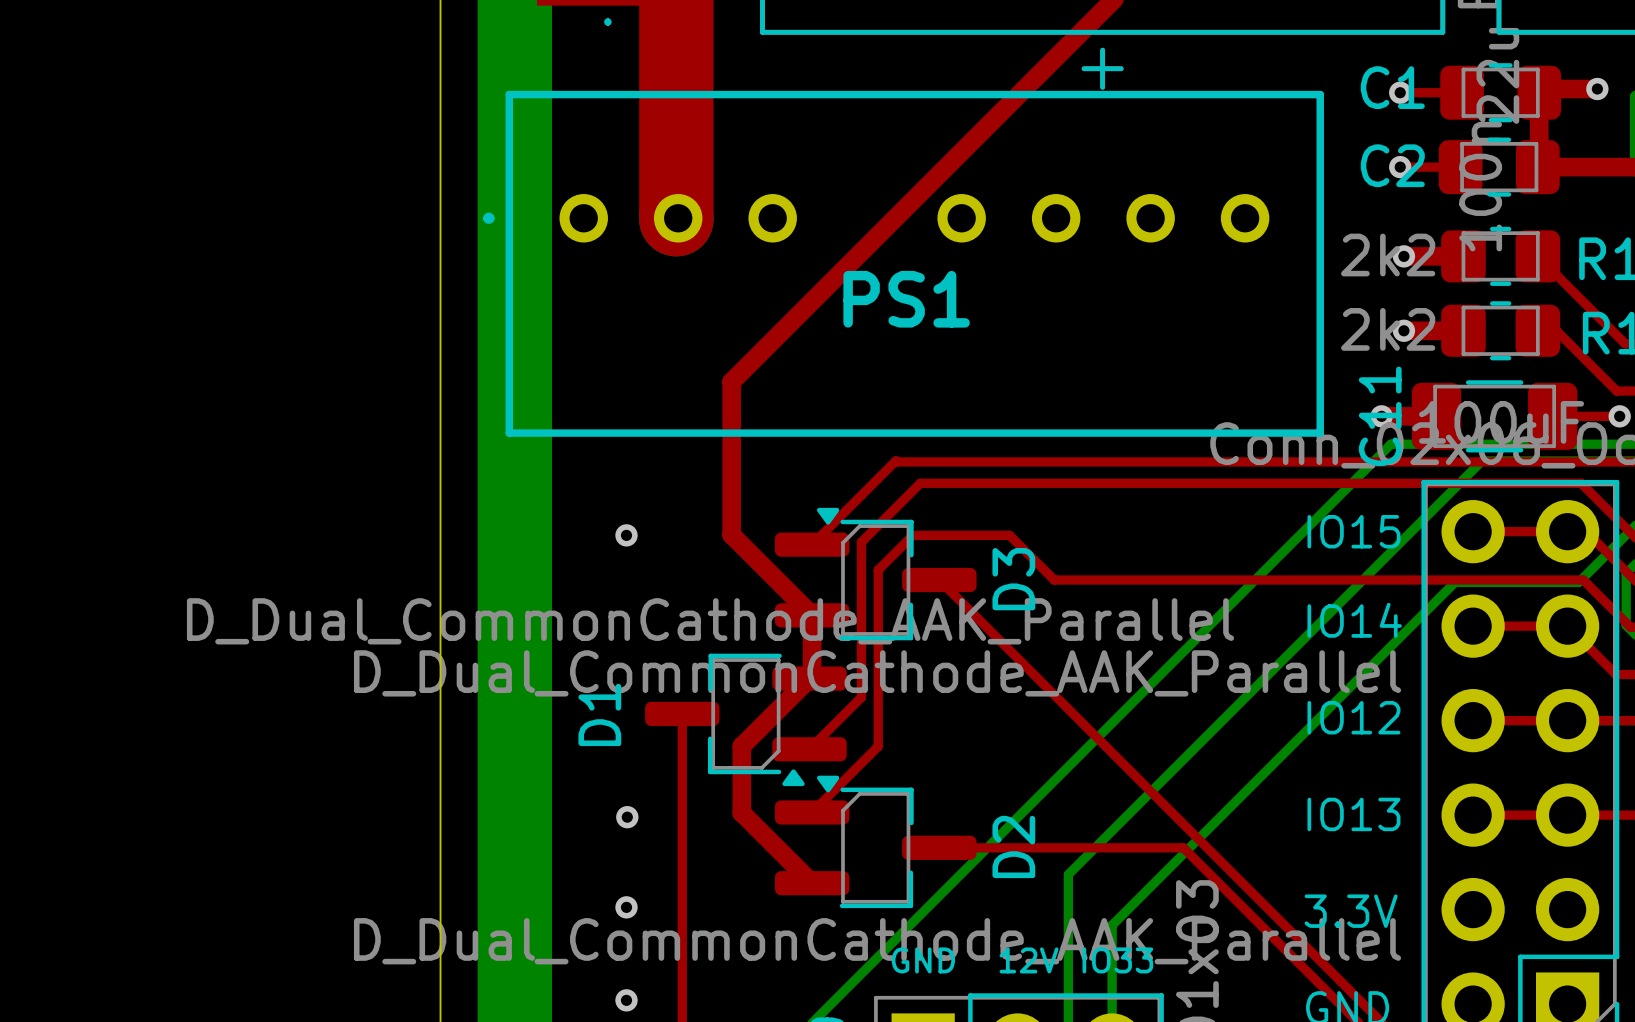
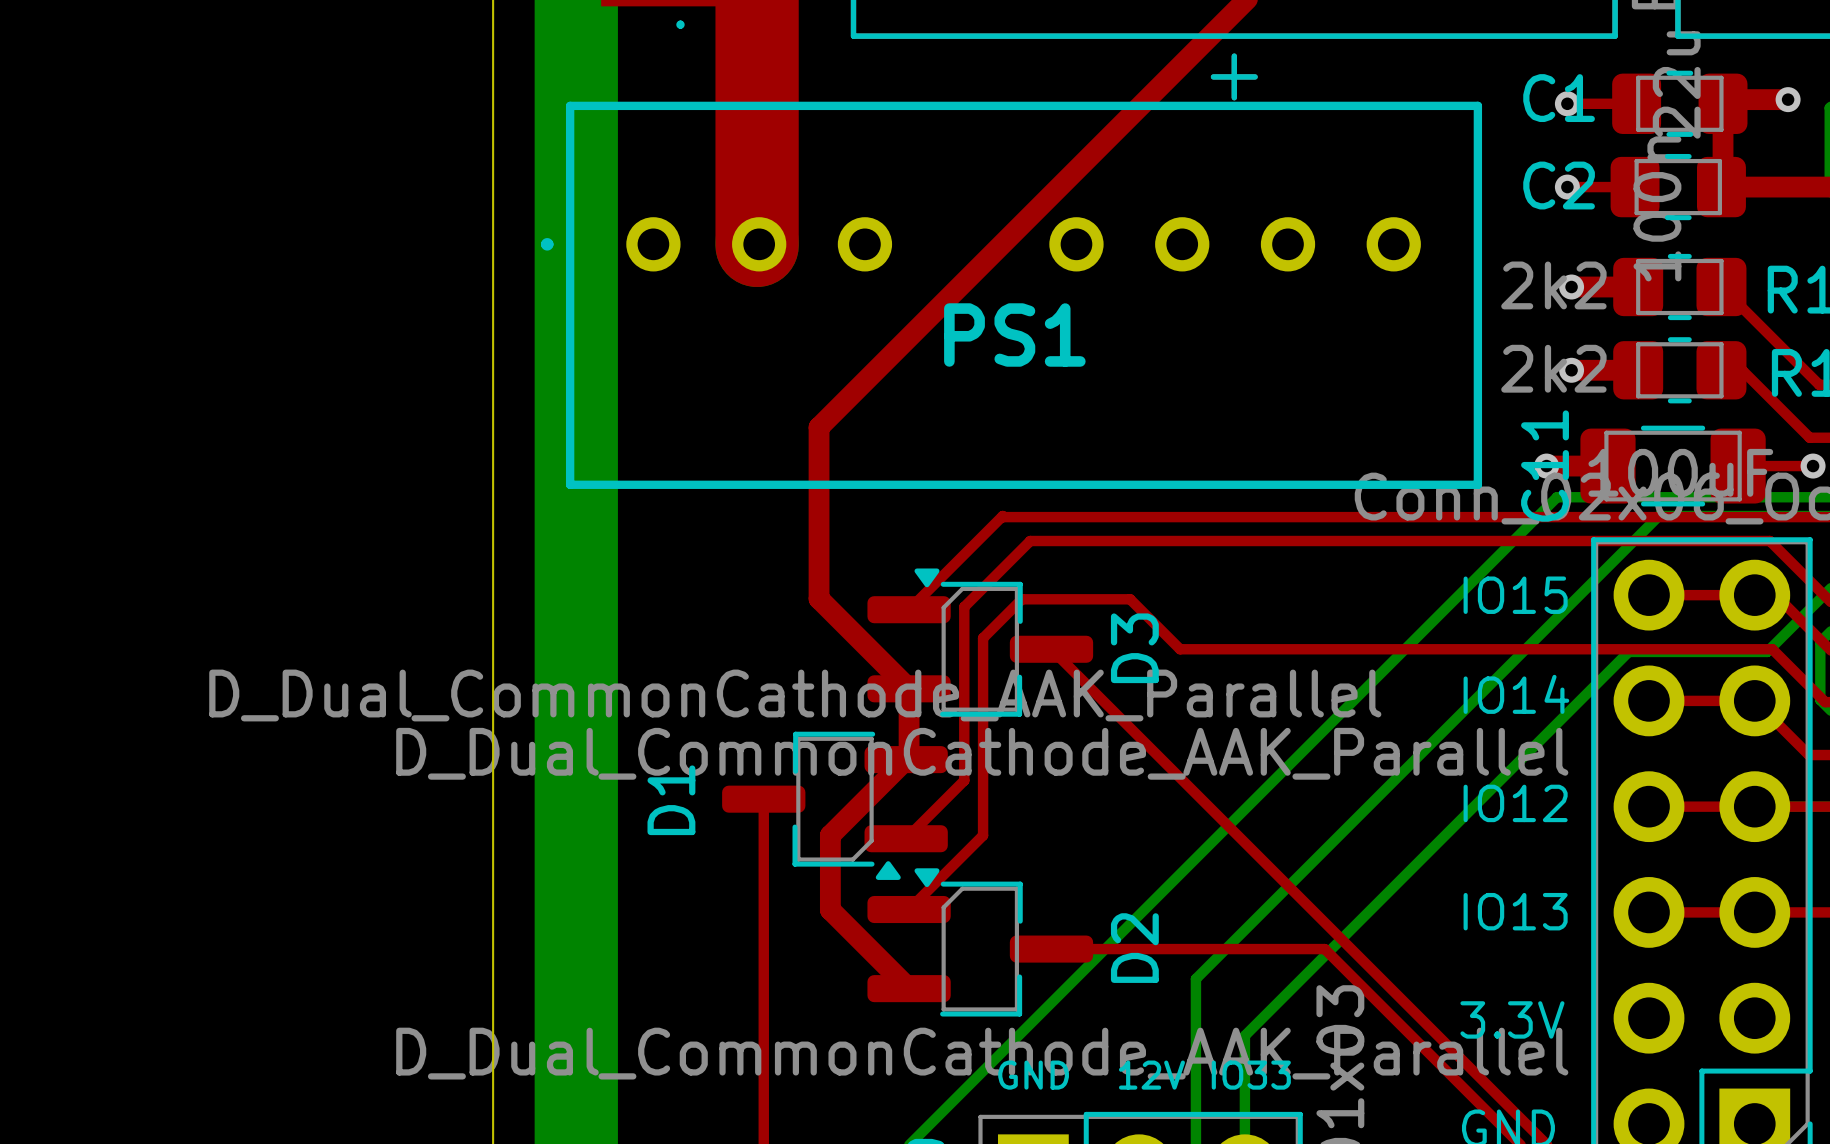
via: (626, 535) -> none
via: (627, 817) -> none
via: (626, 907) -> none
via: (626, 1000) -> none

